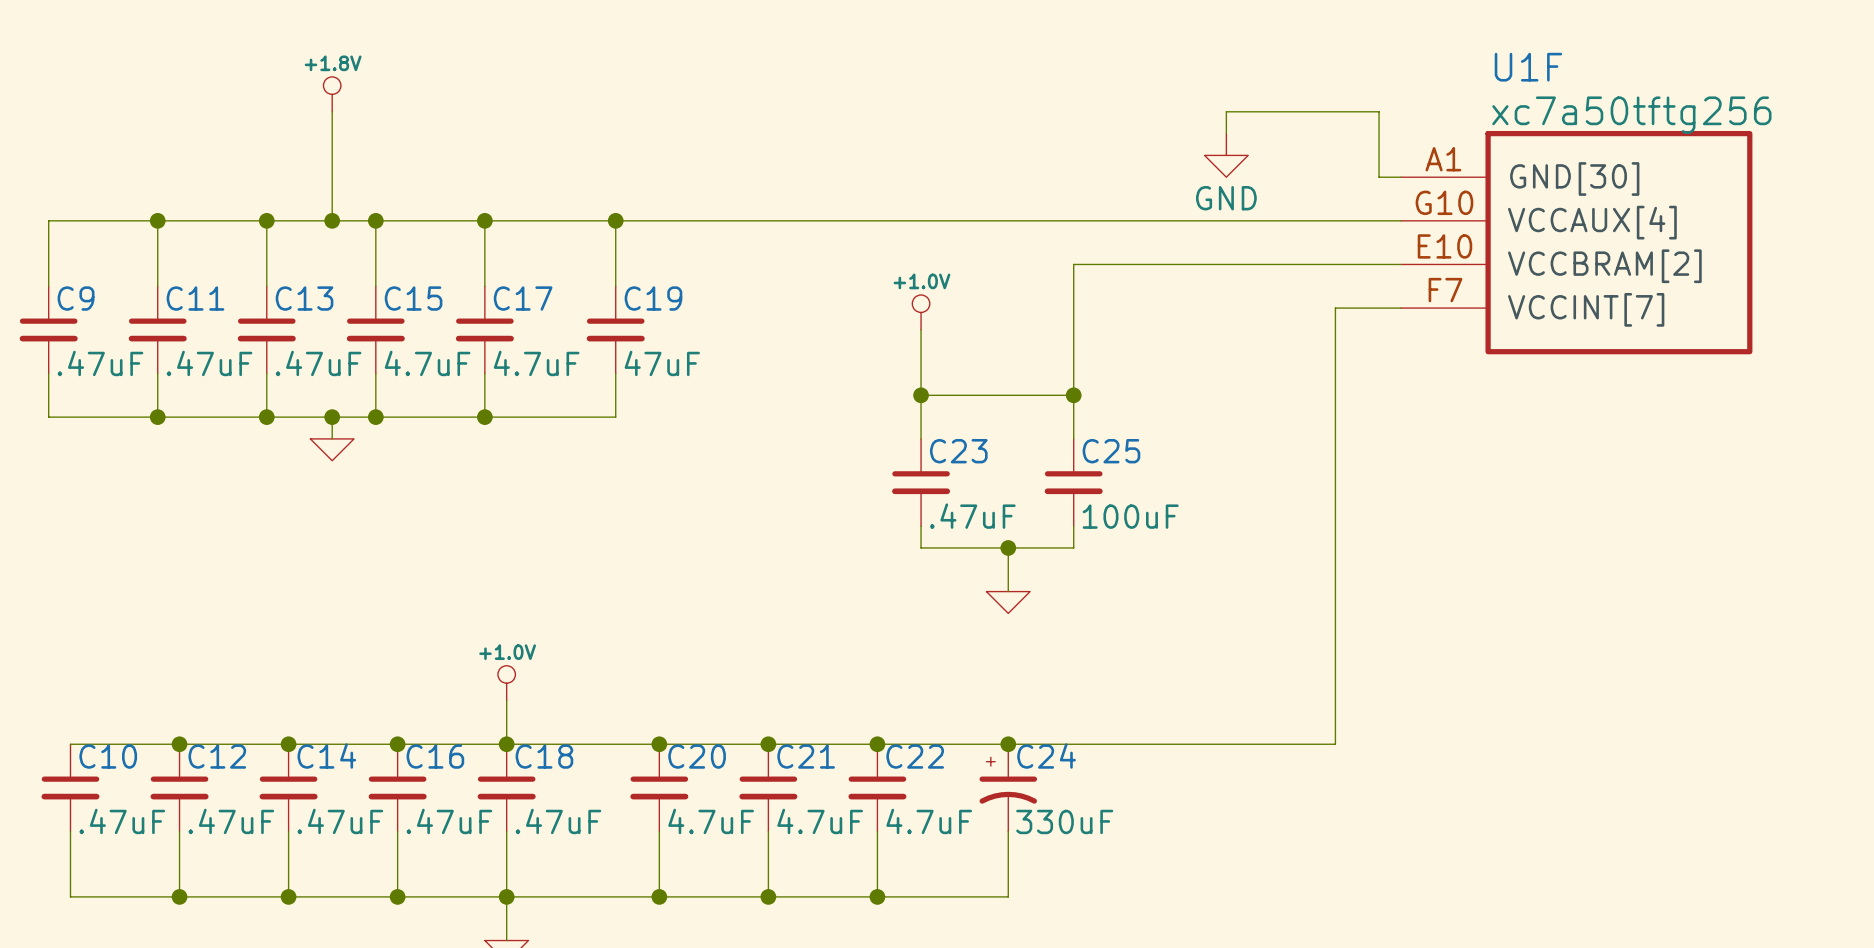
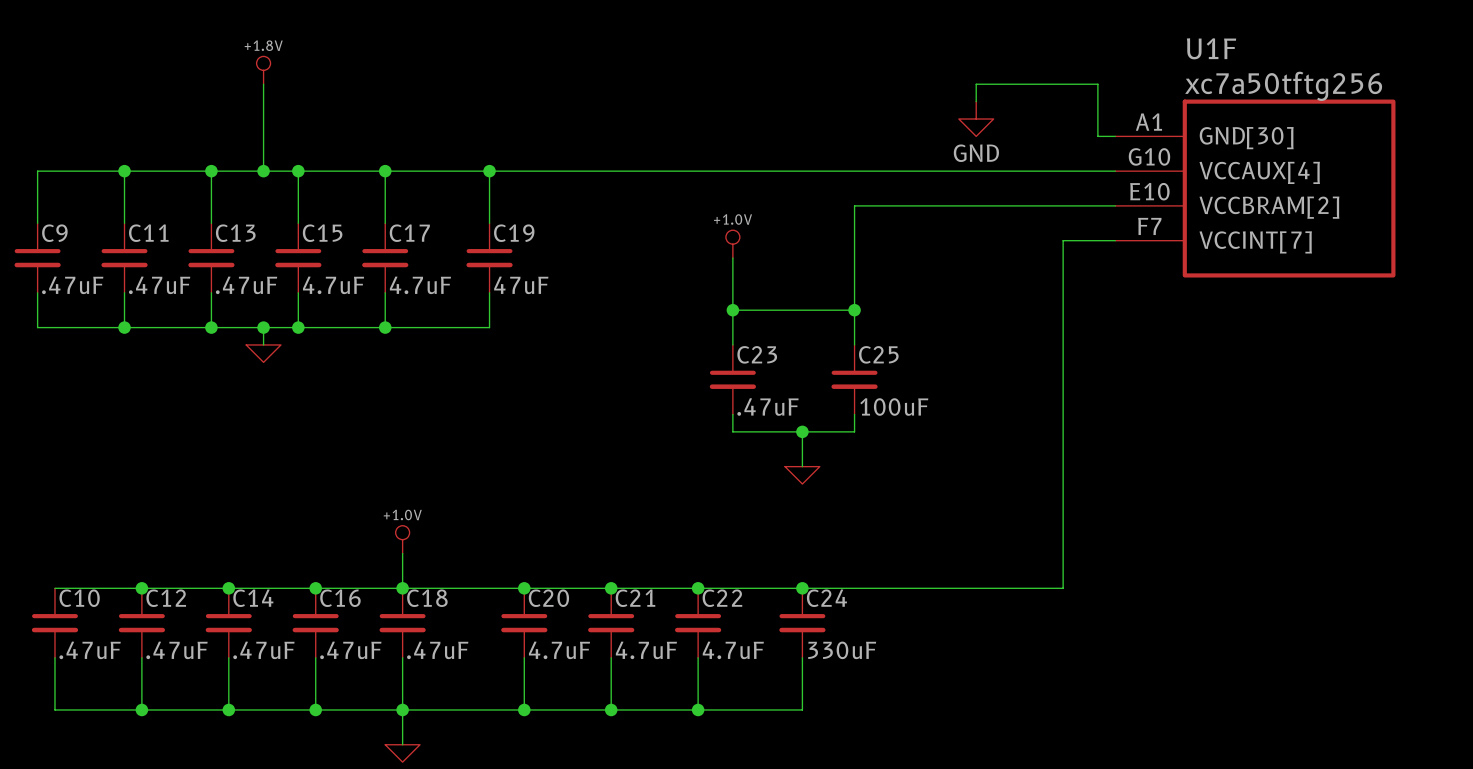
C24 symbol: [979, 744, 1038, 832] -> [779, 588, 826, 658]

